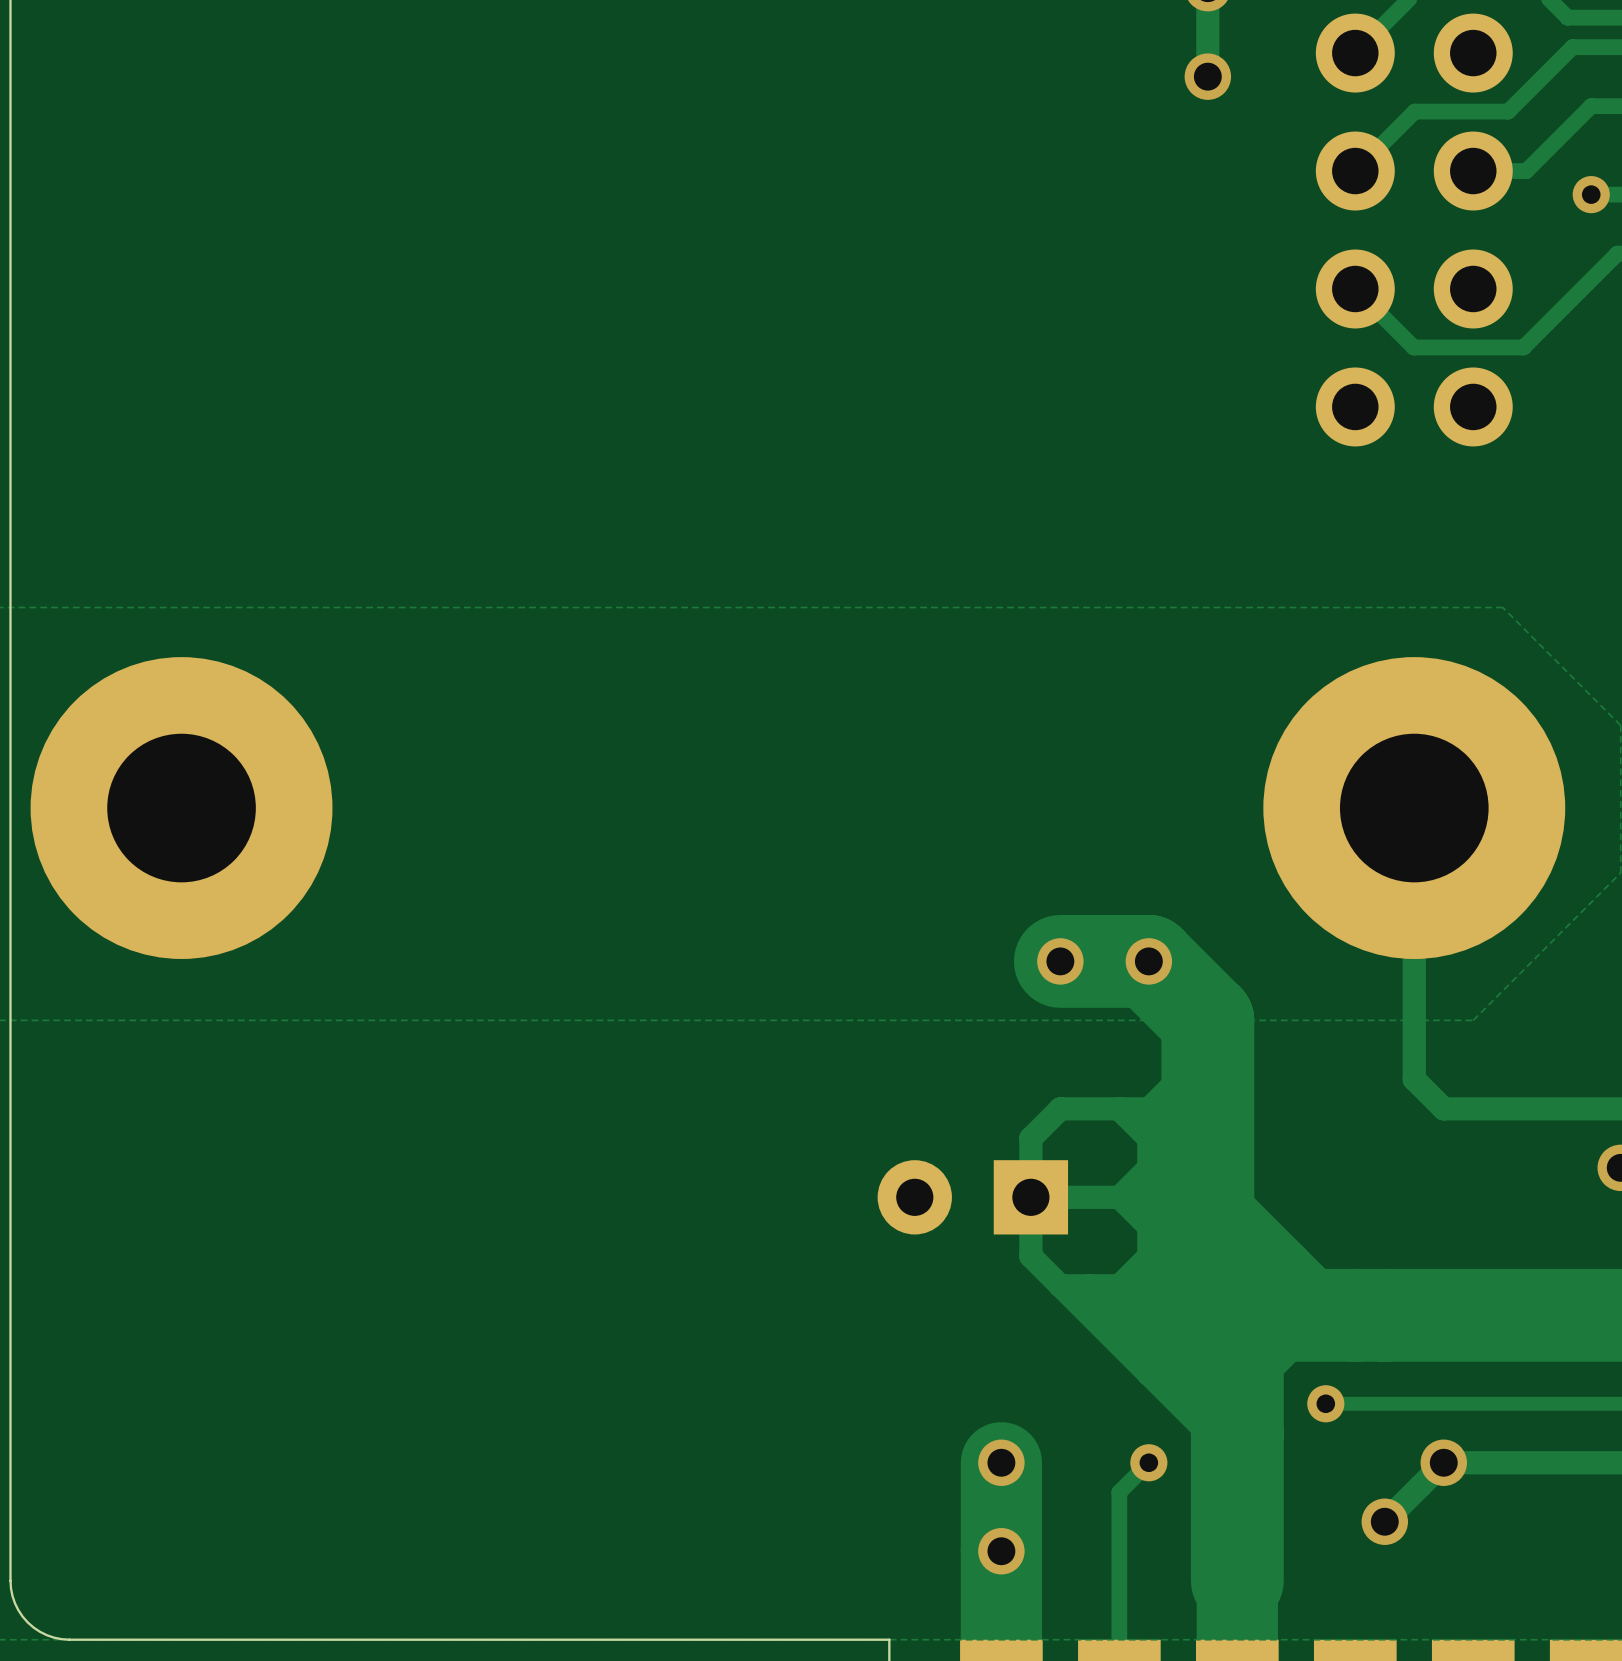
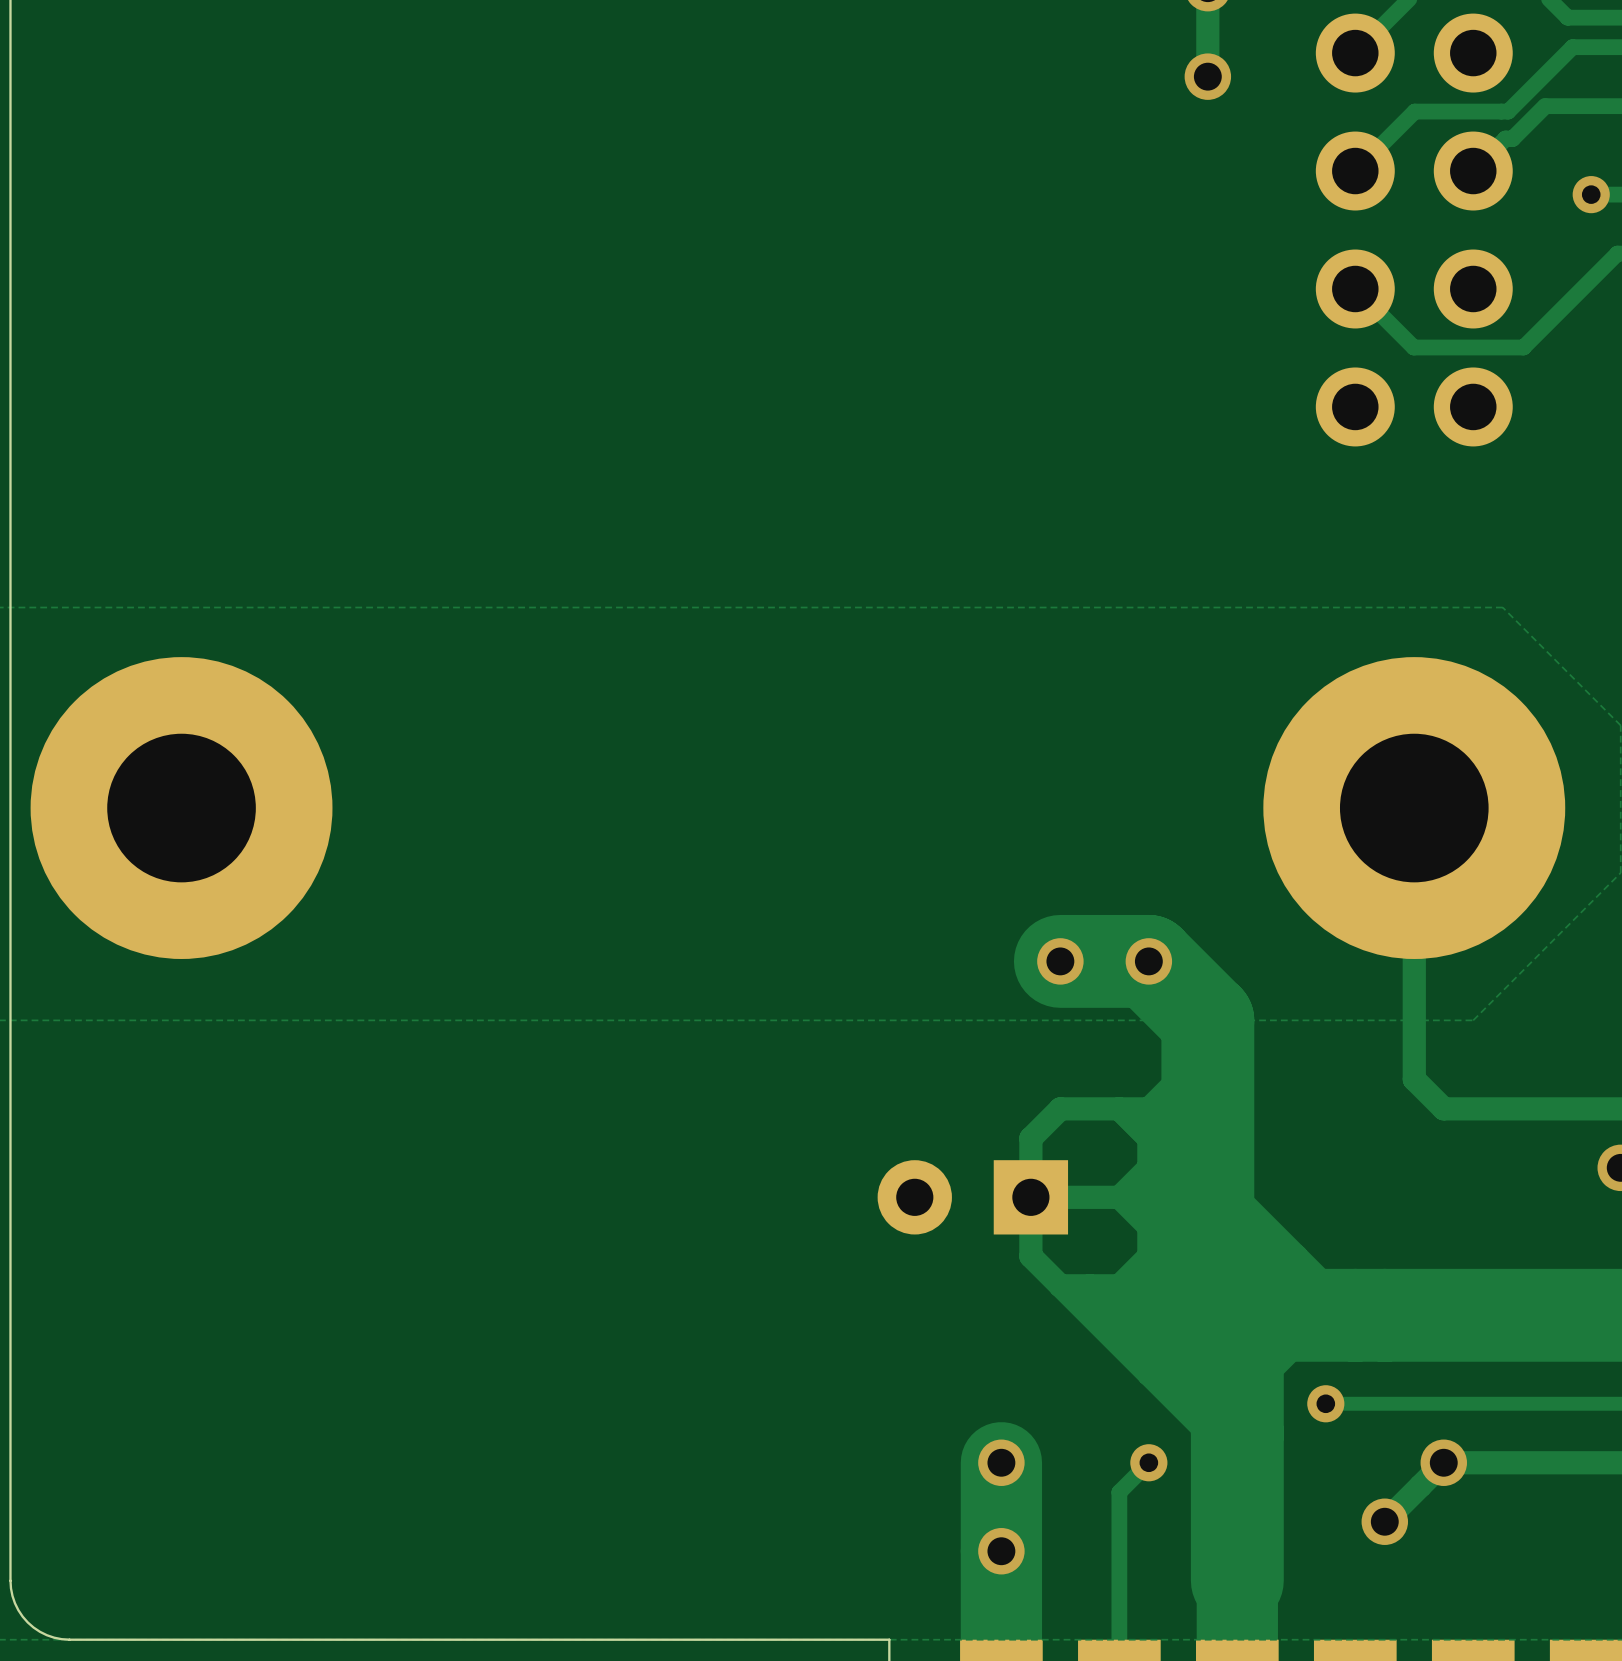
track: (1591, 106) (1526, 171) (1473, 171) -> (1591, 106) (1545, 106) (1512, 138) (1505, 138) (1473, 171)

